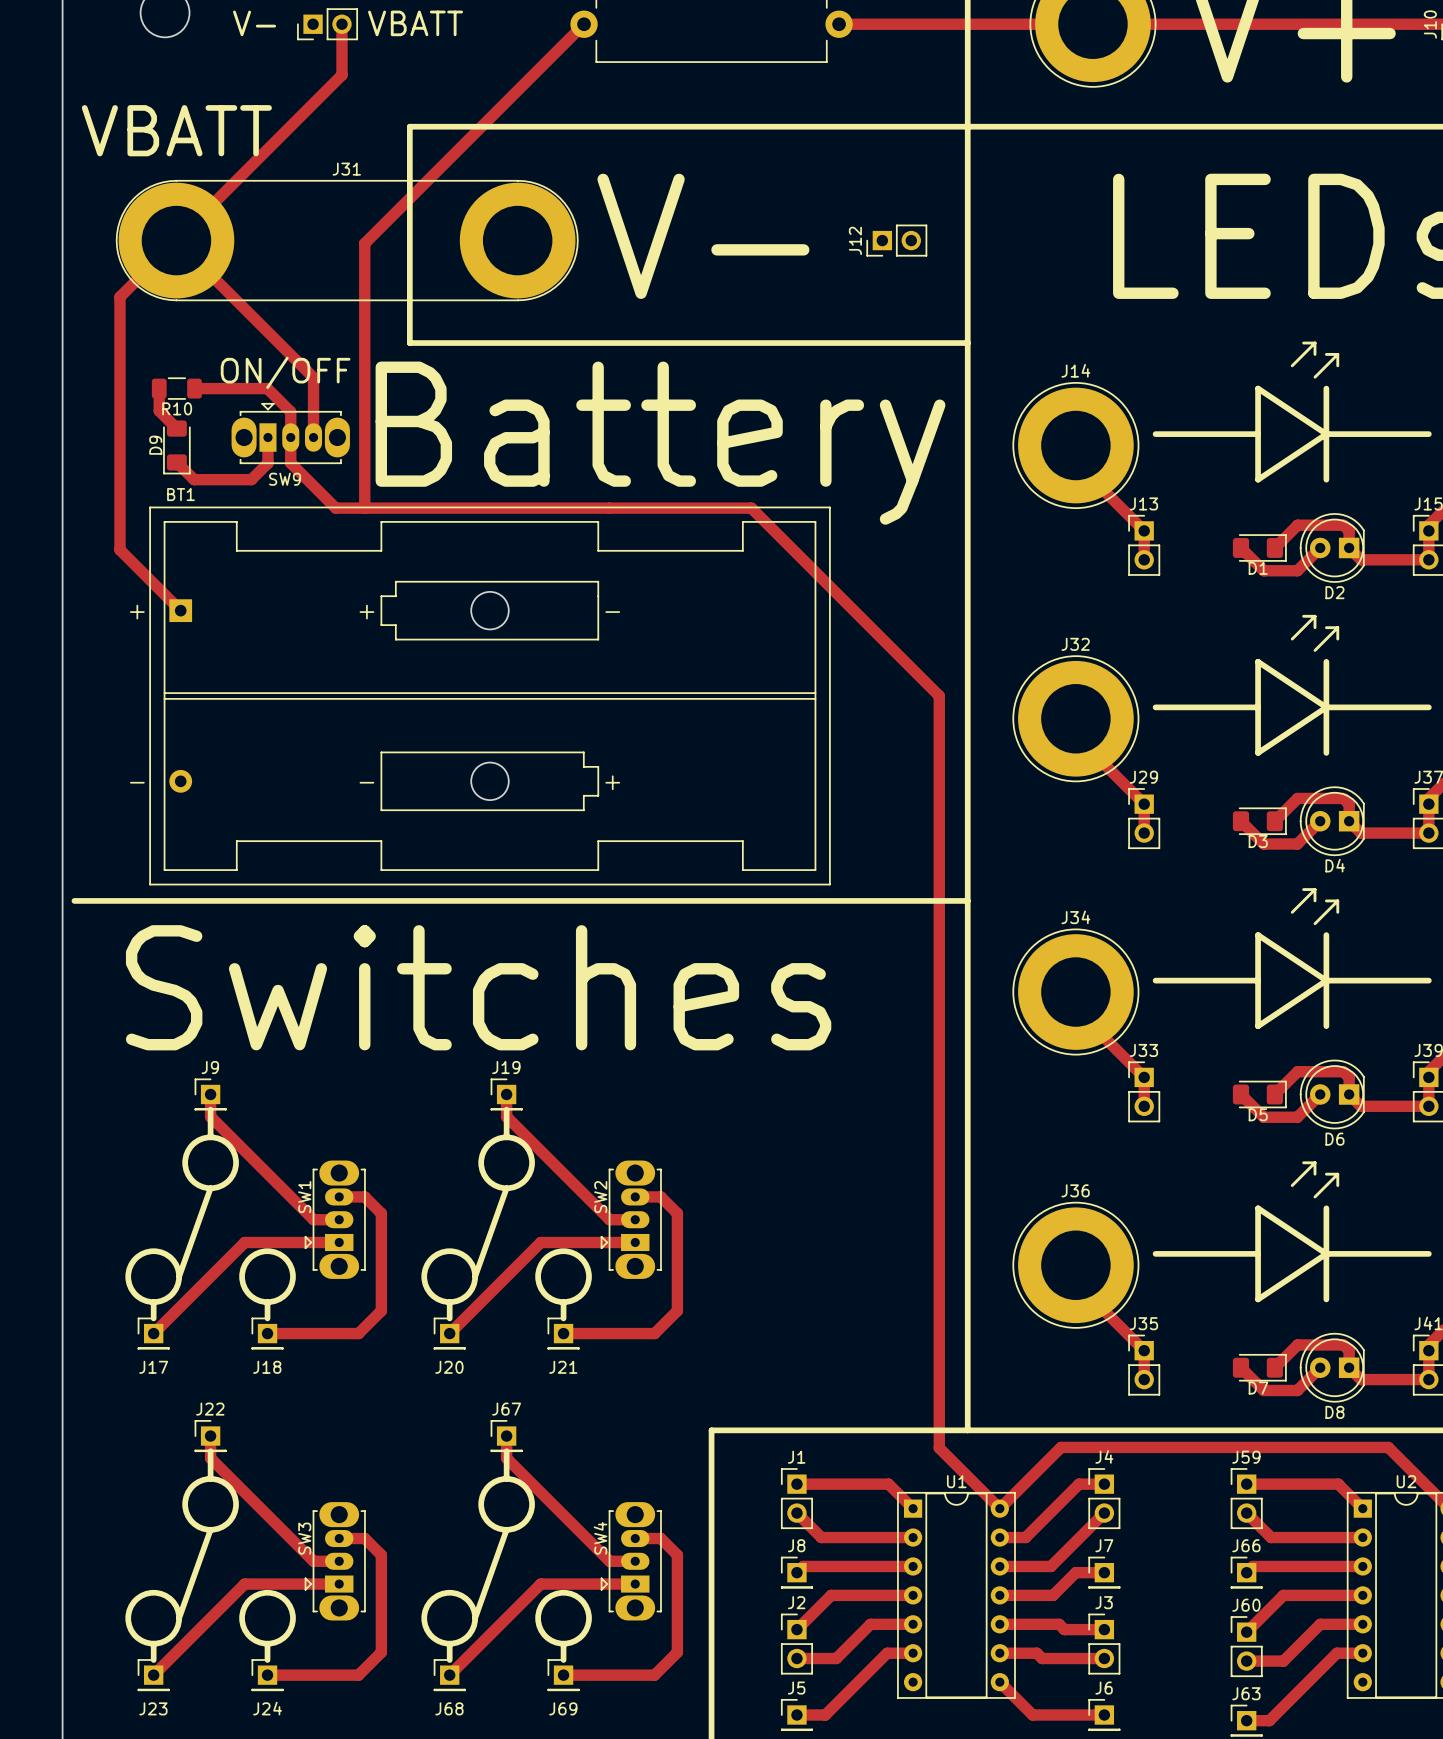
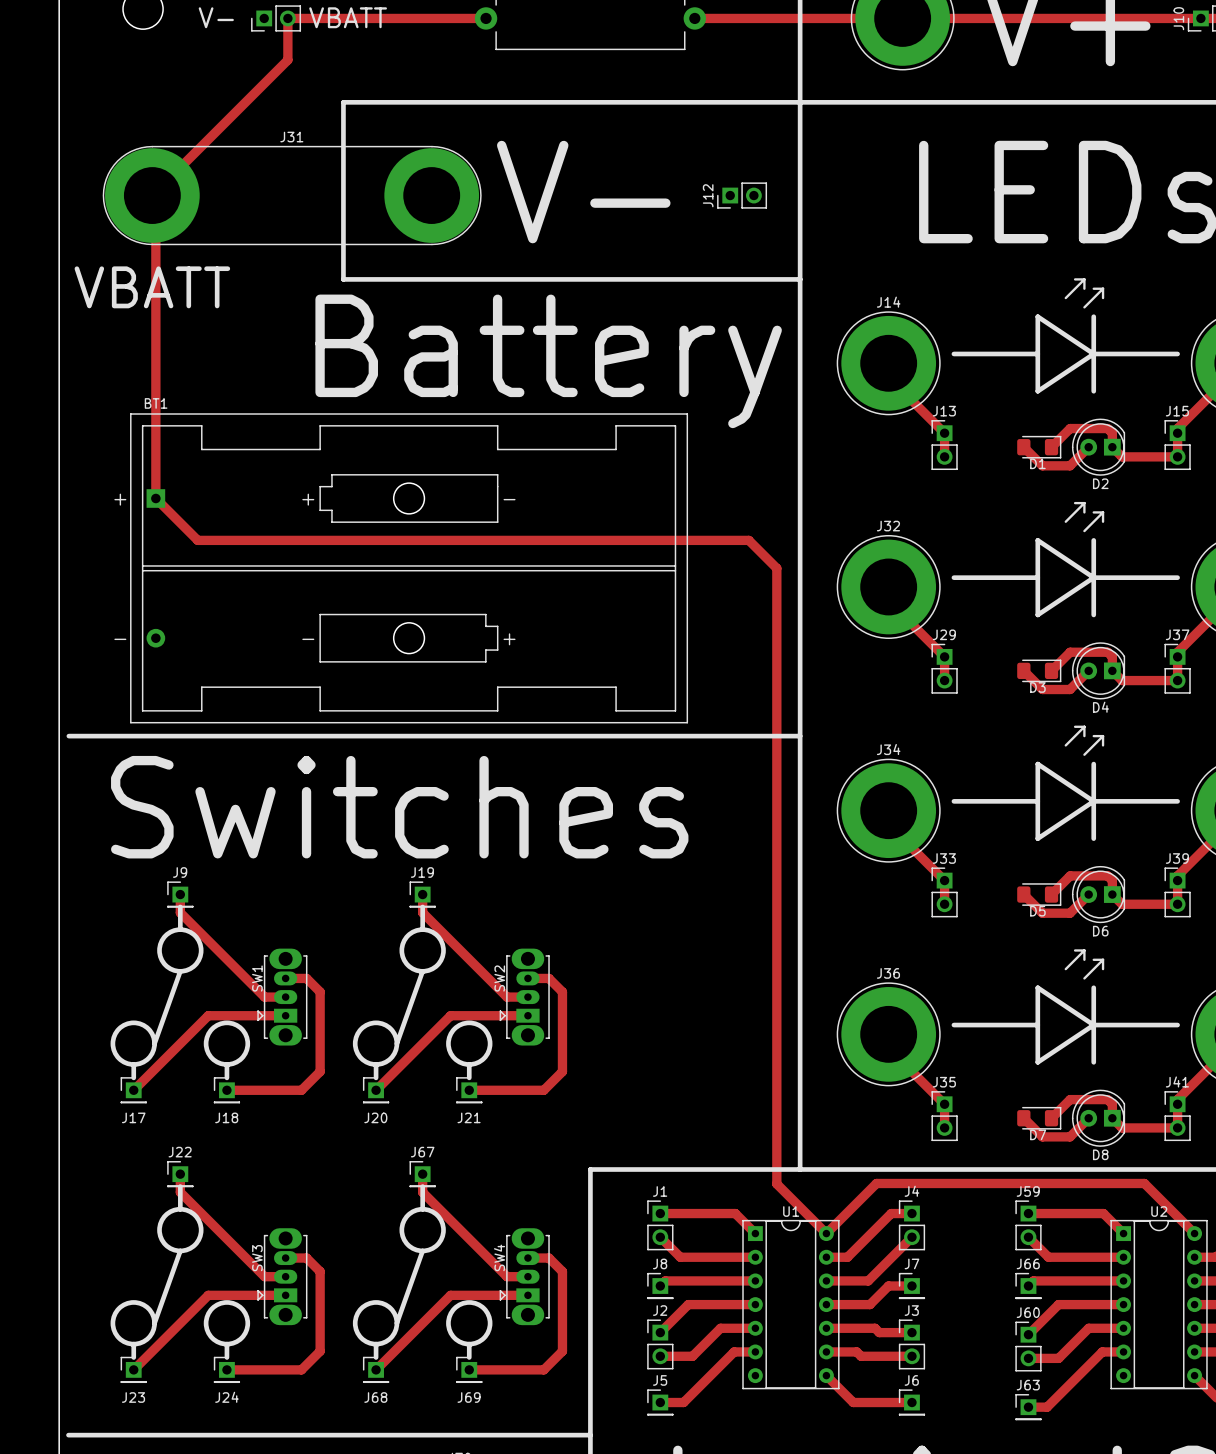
track: (584, 24) (364, 243) (364, 508) -> (486, 18) (287, 18)
text position: VBATT (176, 130) -> VBATT (152, 287)
track: (176, 240) (119, 297) (119, 549) (180, 610) -> none
track: (180, 244) (313, 377) (313, 437) -> none
text: ON/OFF (285, 372) -> none
track: (159, 388) (159, 410) (176, 428) -> none
R10: (176, 388) -> none
track: (194, 388) (267, 388) (290, 411) (290, 463) (335, 508) (751, 508) (905, 661) -> (155, 199) (155, 498) (197, 540) (748, 540)
SW9: (290, 433) -> none
track: (267, 437) (267, 463) (251, 479) (194, 479) (176, 462) -> none
D9: (176, 447) -> none

